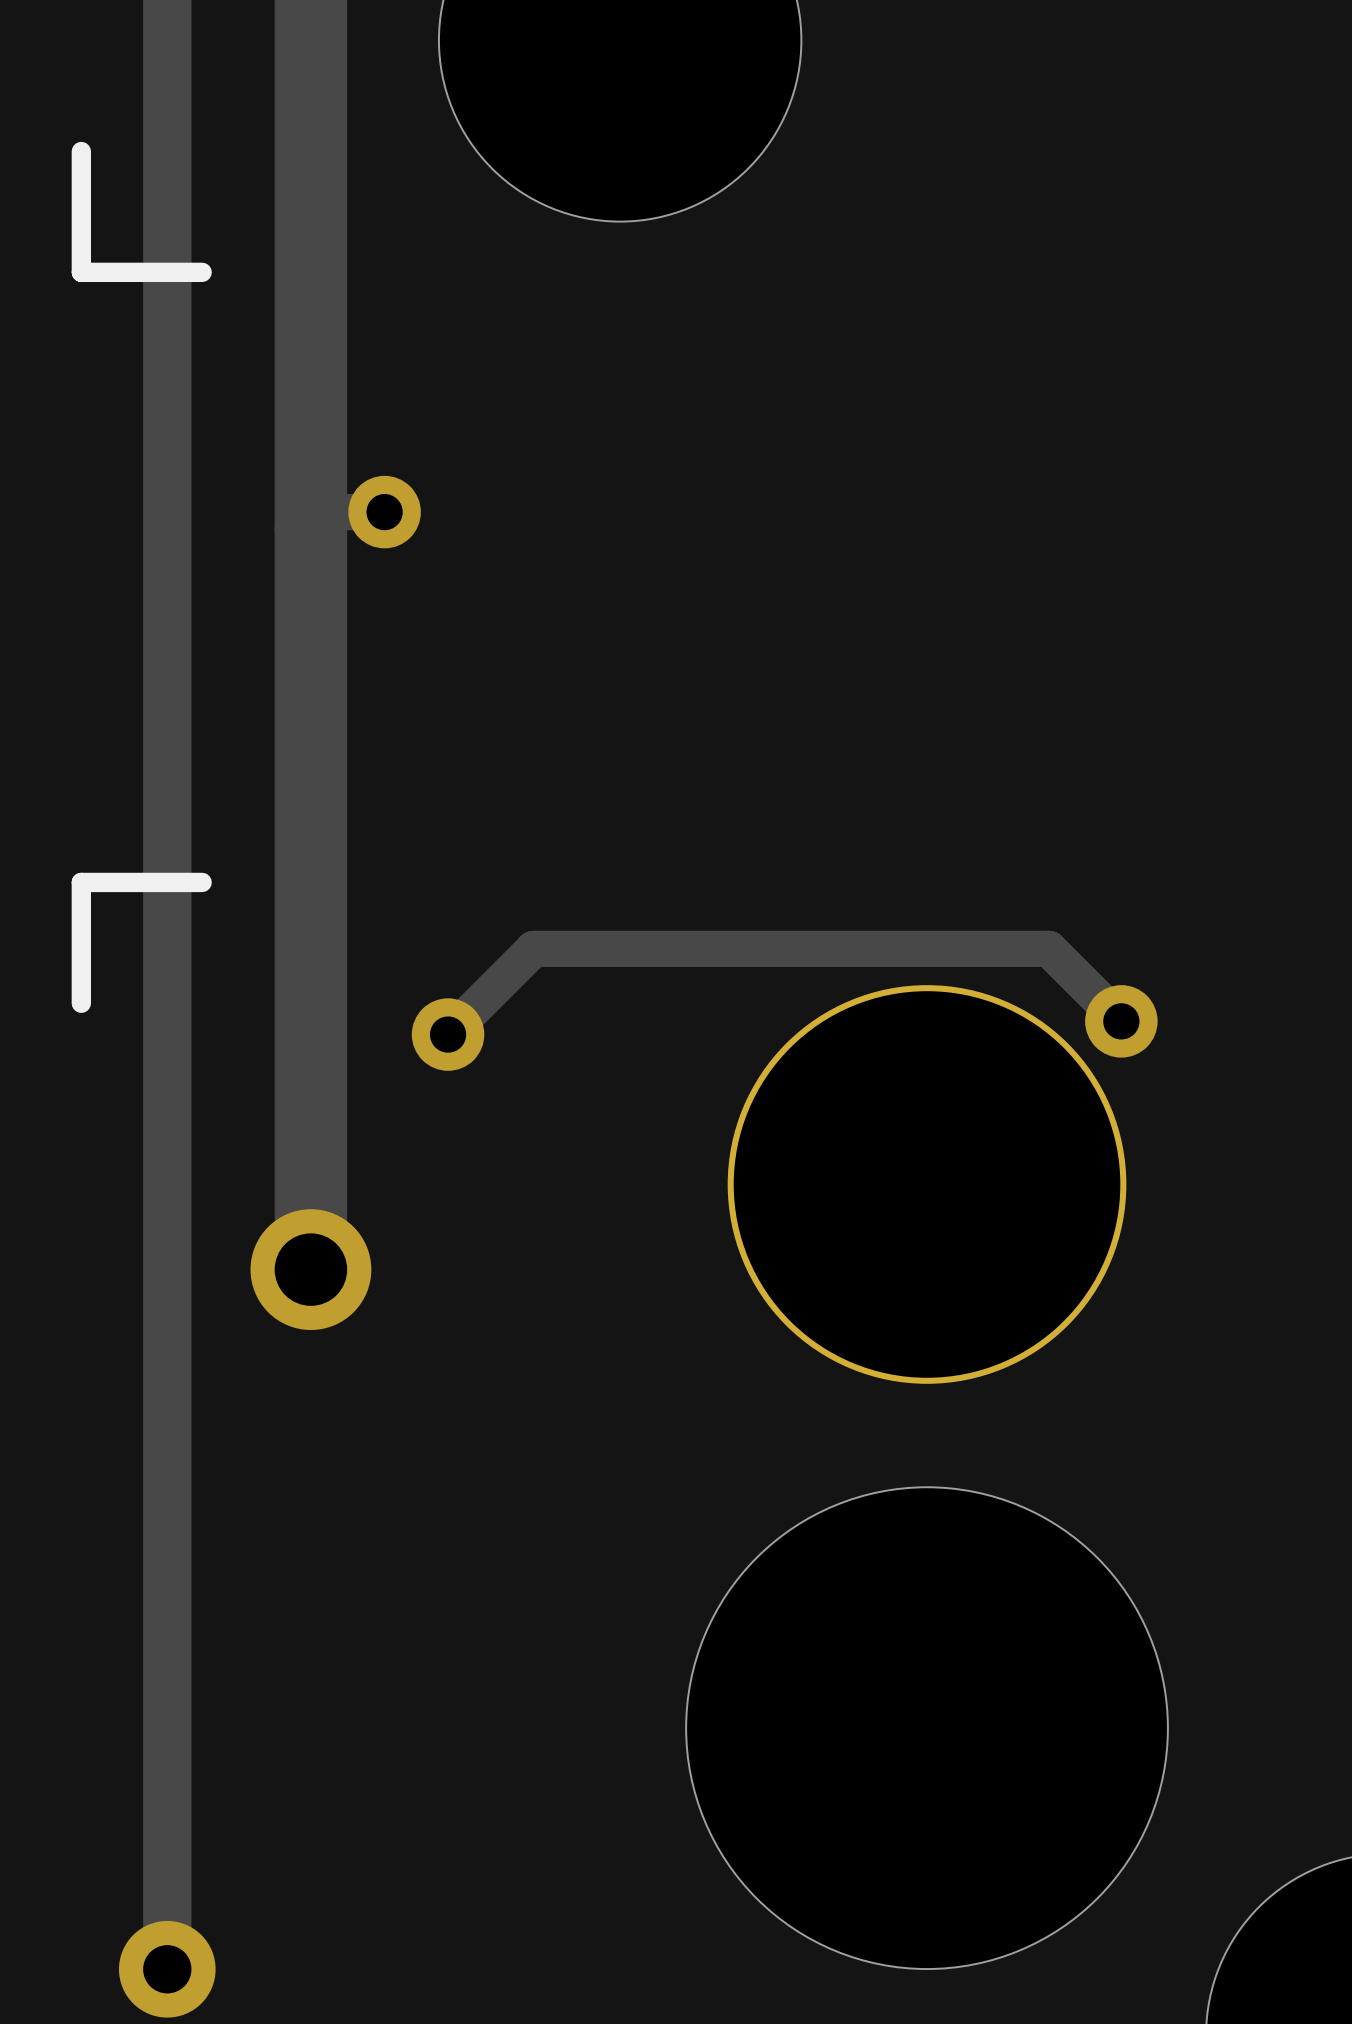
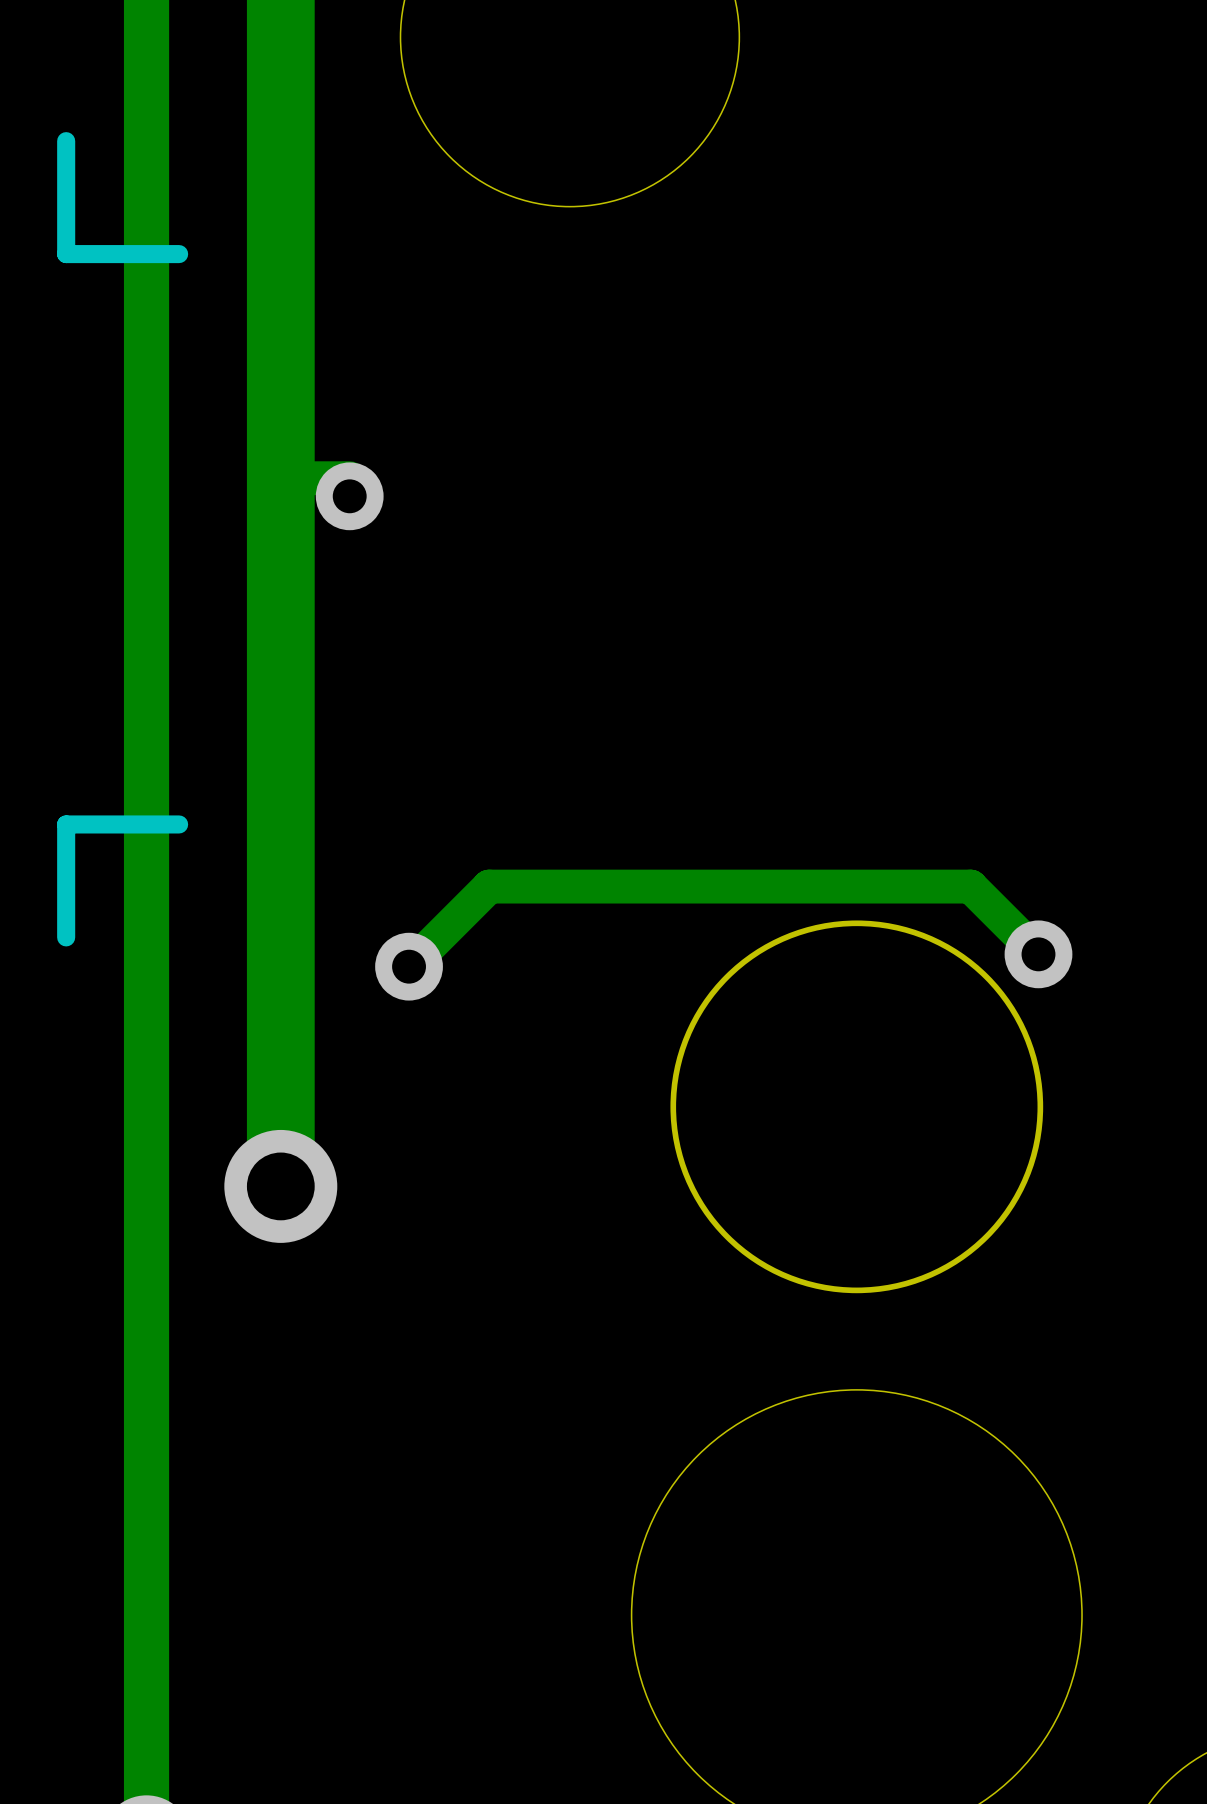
via position: (384, 512) -> (349, 496)

